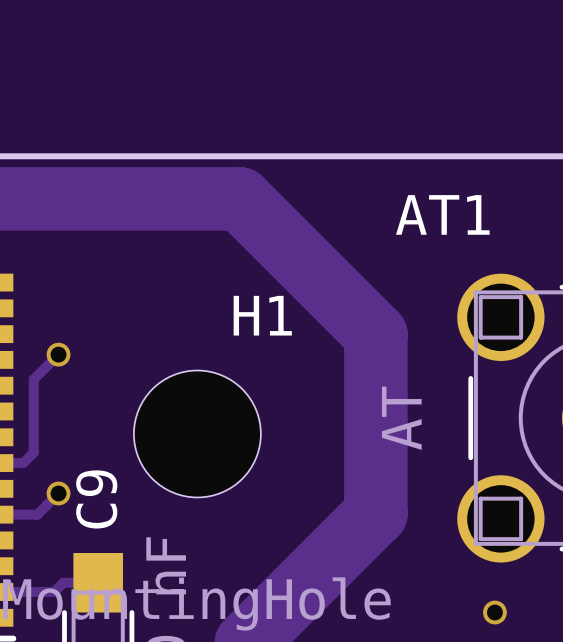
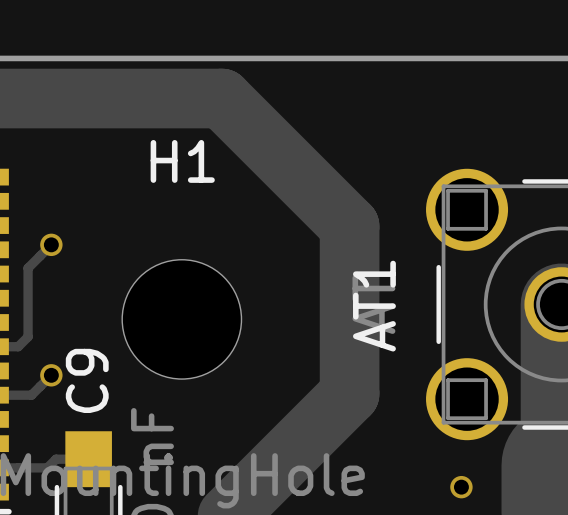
AT1 name rotation: 0° (442, 214) -> 90° counterclockwise (374, 306)
AT1 name position: AT1 (442, 214) -> AT1 (374, 306)
H1 name position: H1 (262, 315) -> H1 (182, 161)

